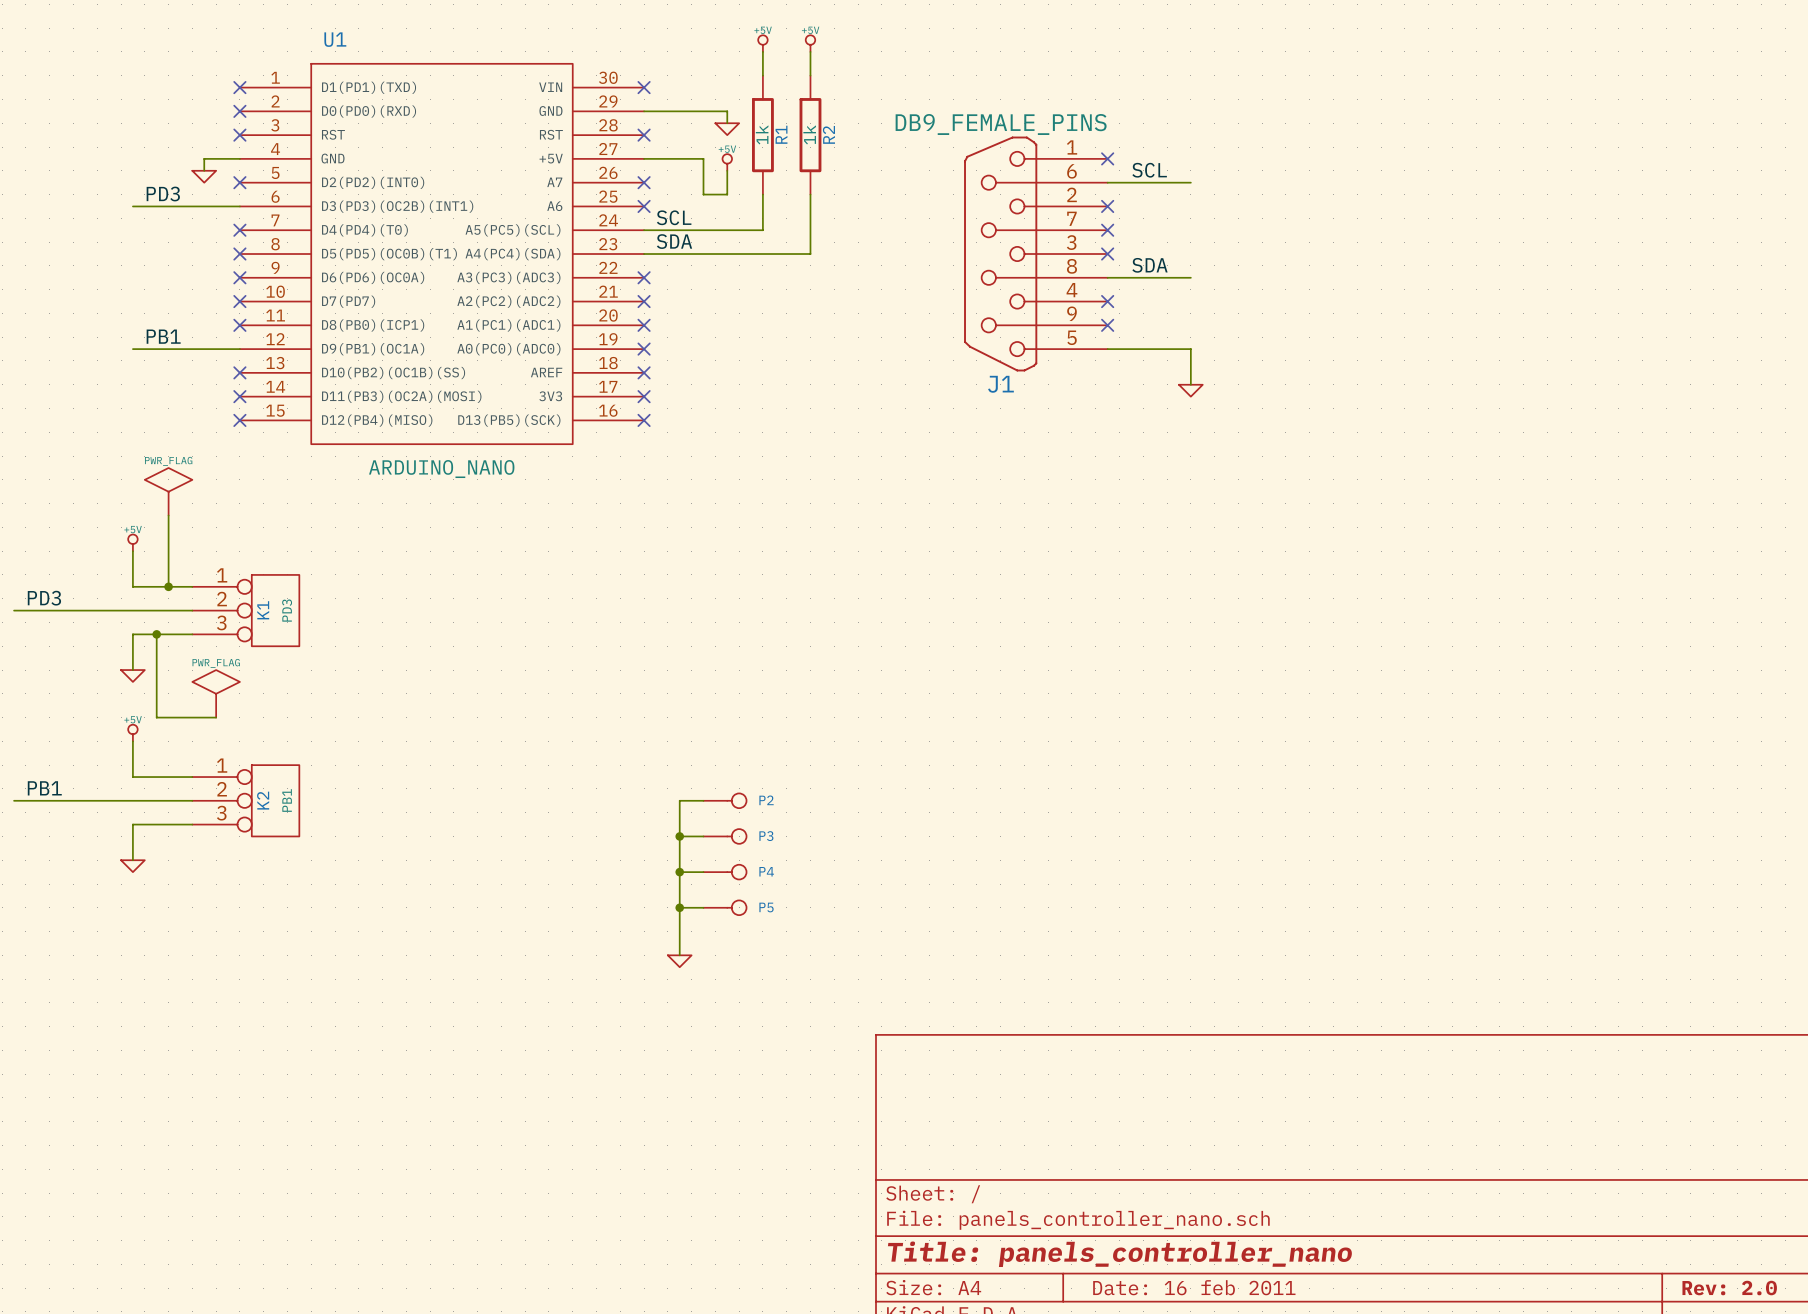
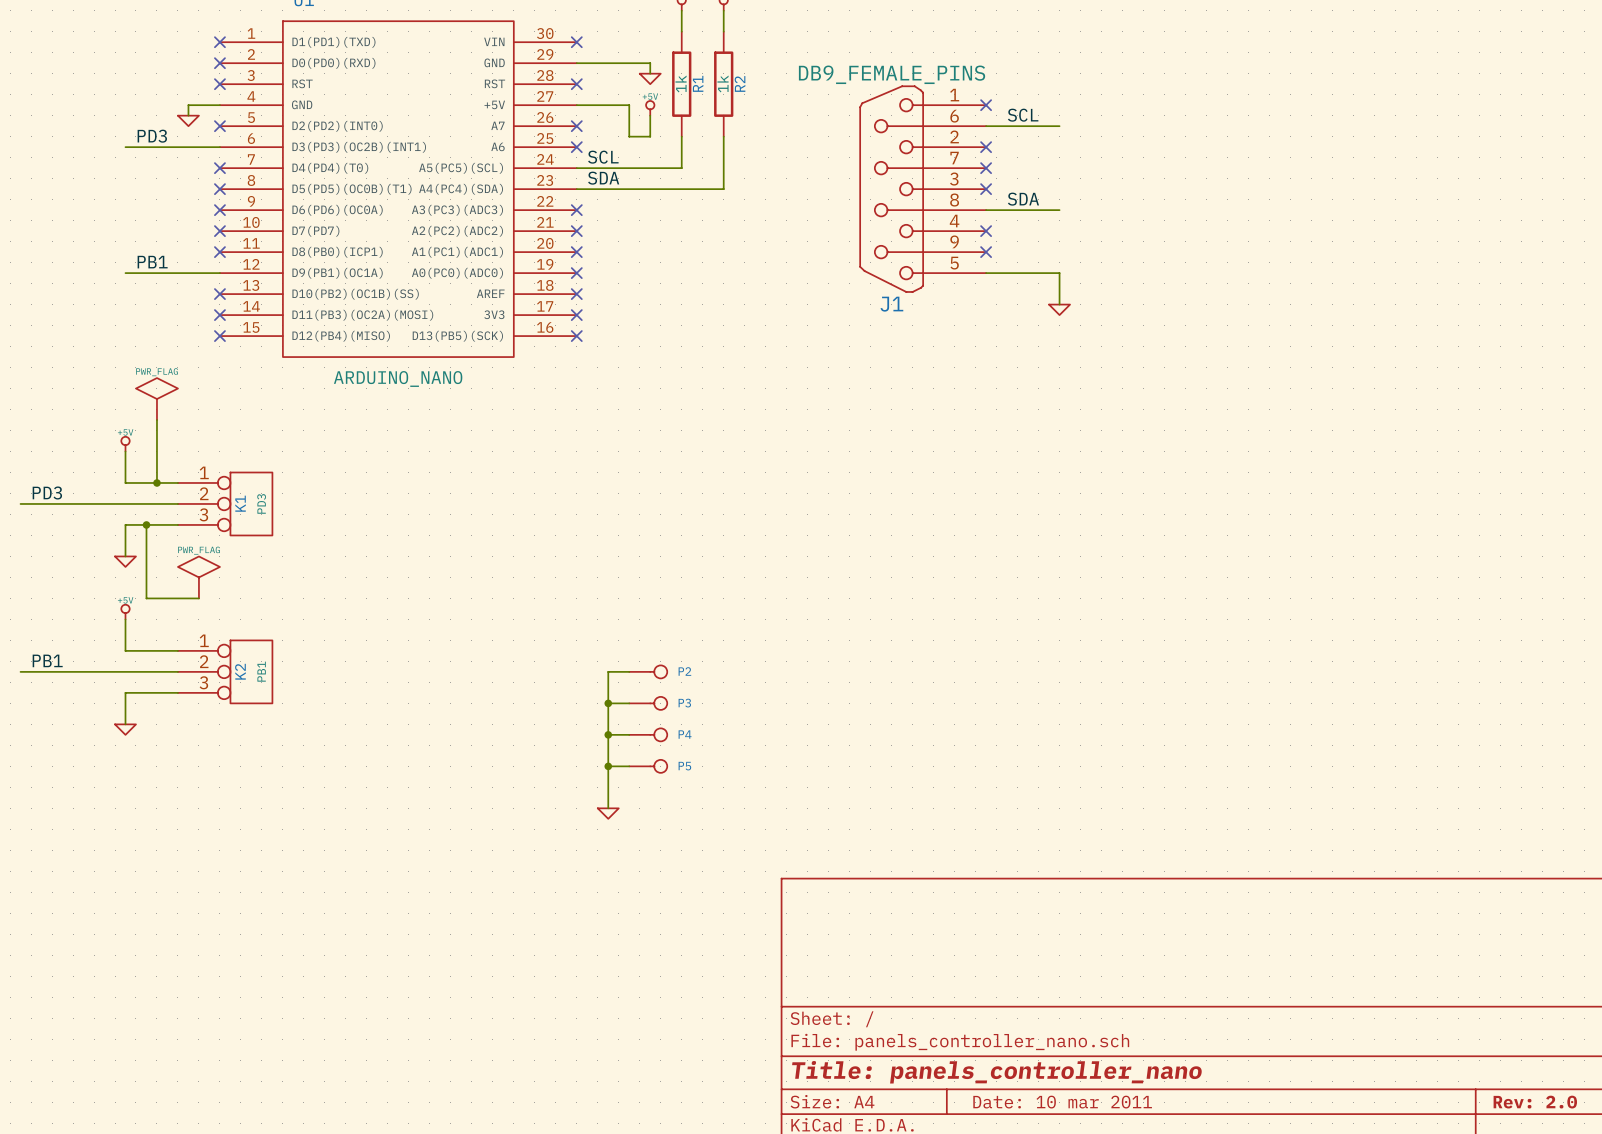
title block: Date: 16 feb 2011 (1194, 1287) -> Date: 10 mar 2011 (1062, 1102)

